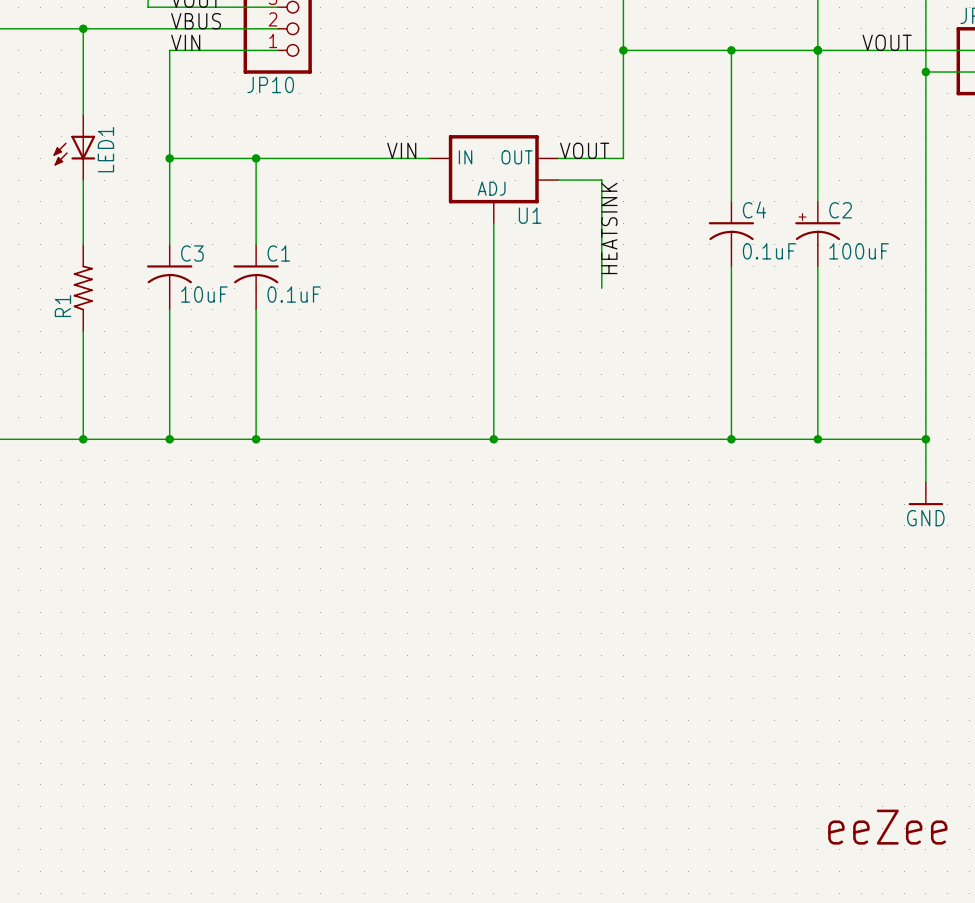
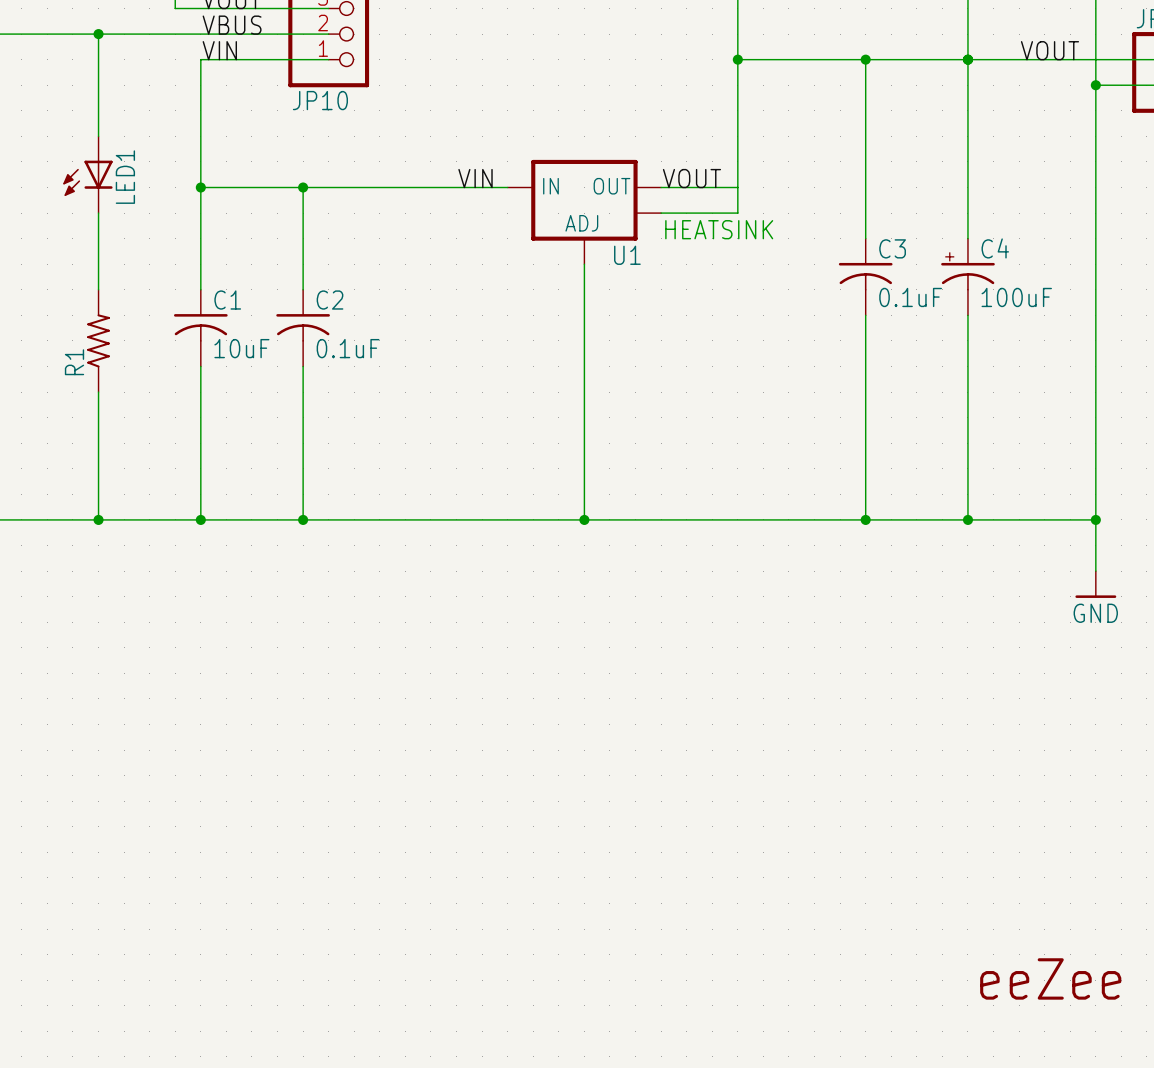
wire: (601, 180) (601, 288) -> (712, 213) (737, 213) (737, 187)
text: none -> HEATSINK (719, 229)
C4 name: C4 (754, 209) -> C3 (892, 248)
C2 name: C2 (840, 210) -> C4 (995, 248)
label: HEATSINK (609, 228) -> none
C3 name: C3 (192, 253) -> C1 (227, 300)
C1 name: C1 (278, 253) -> C2 (330, 300)

